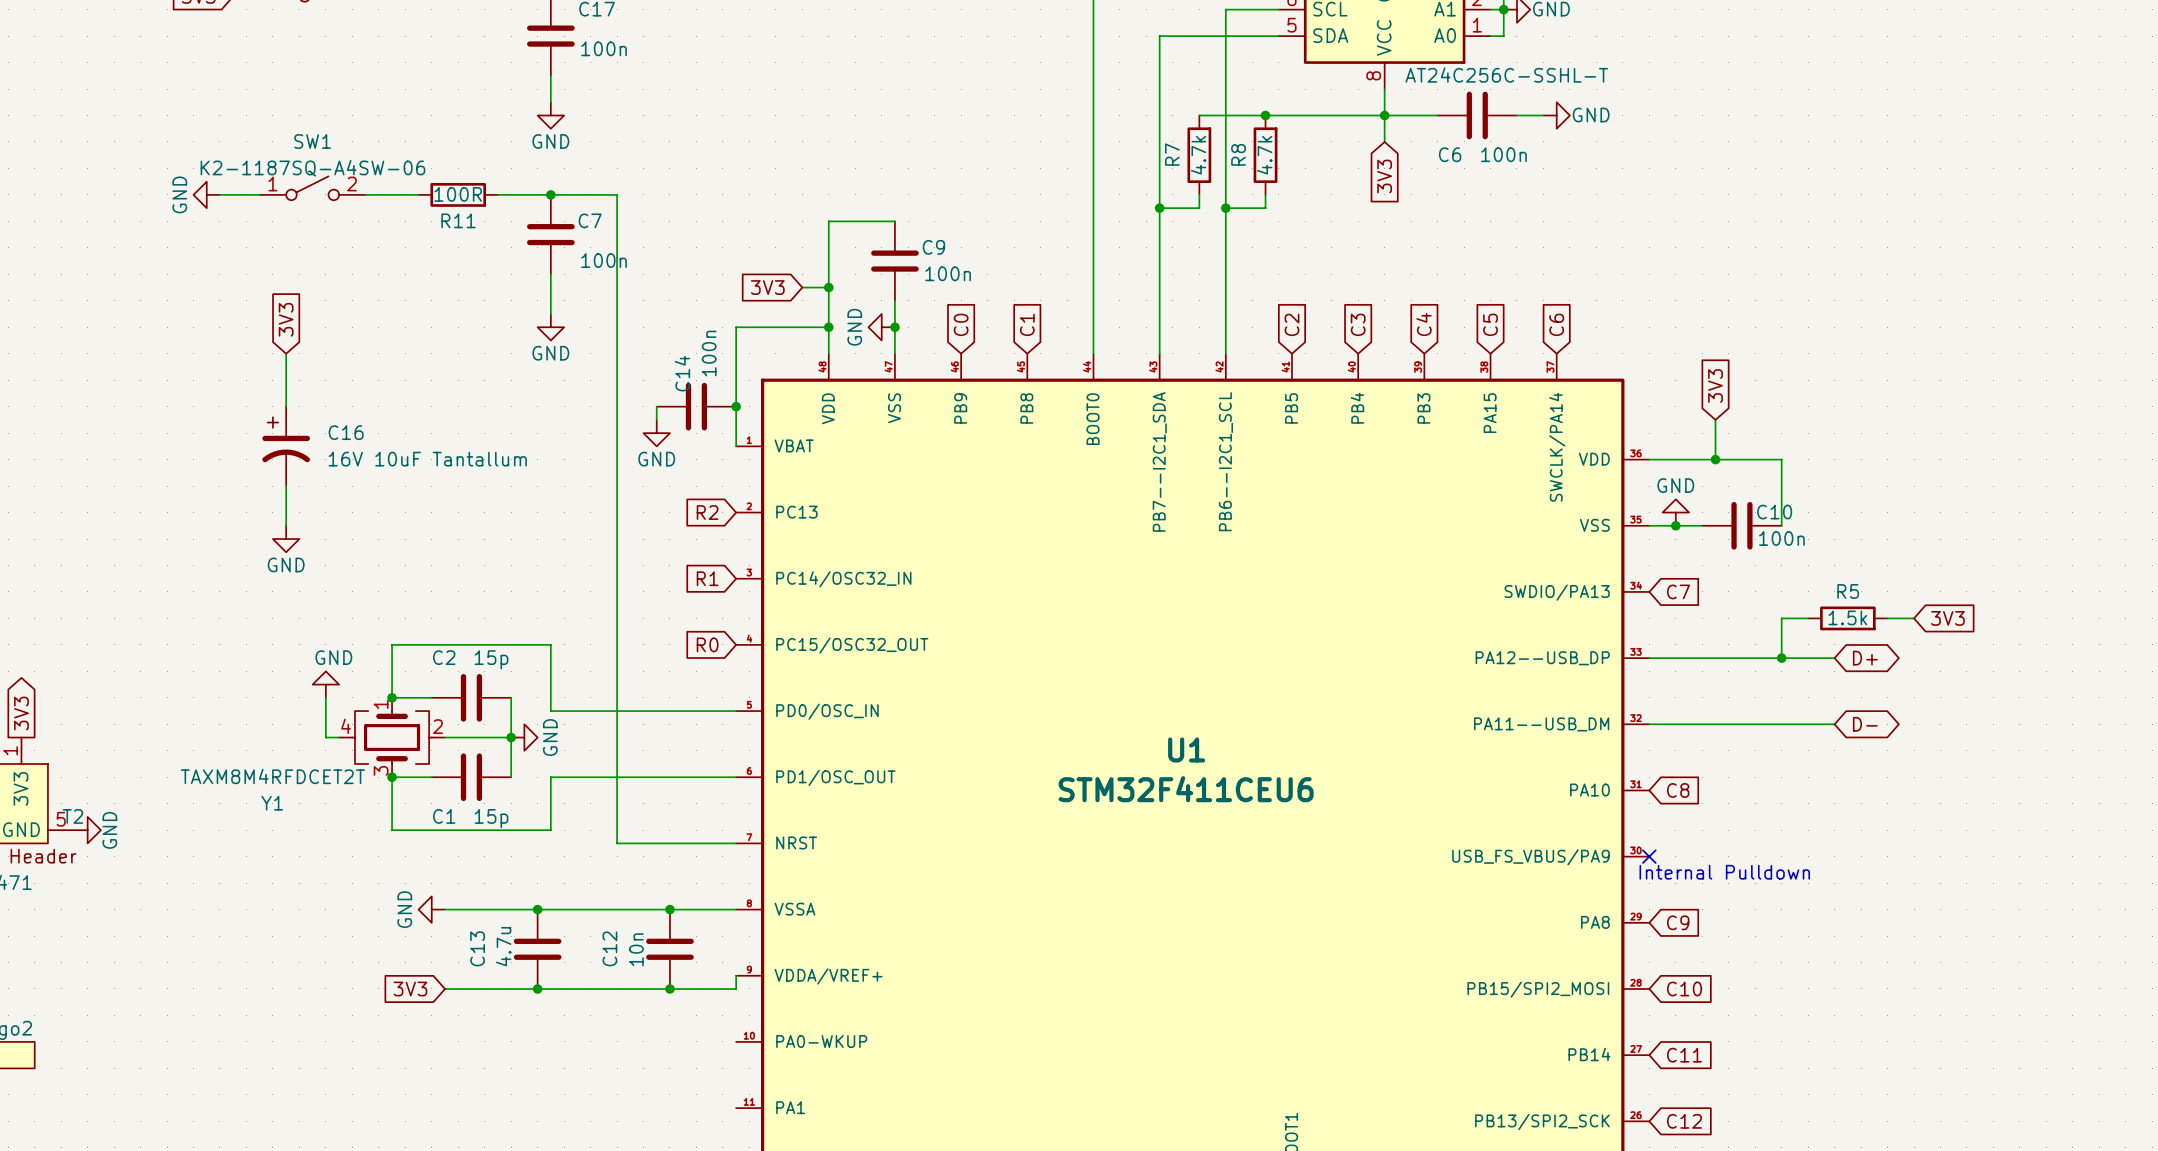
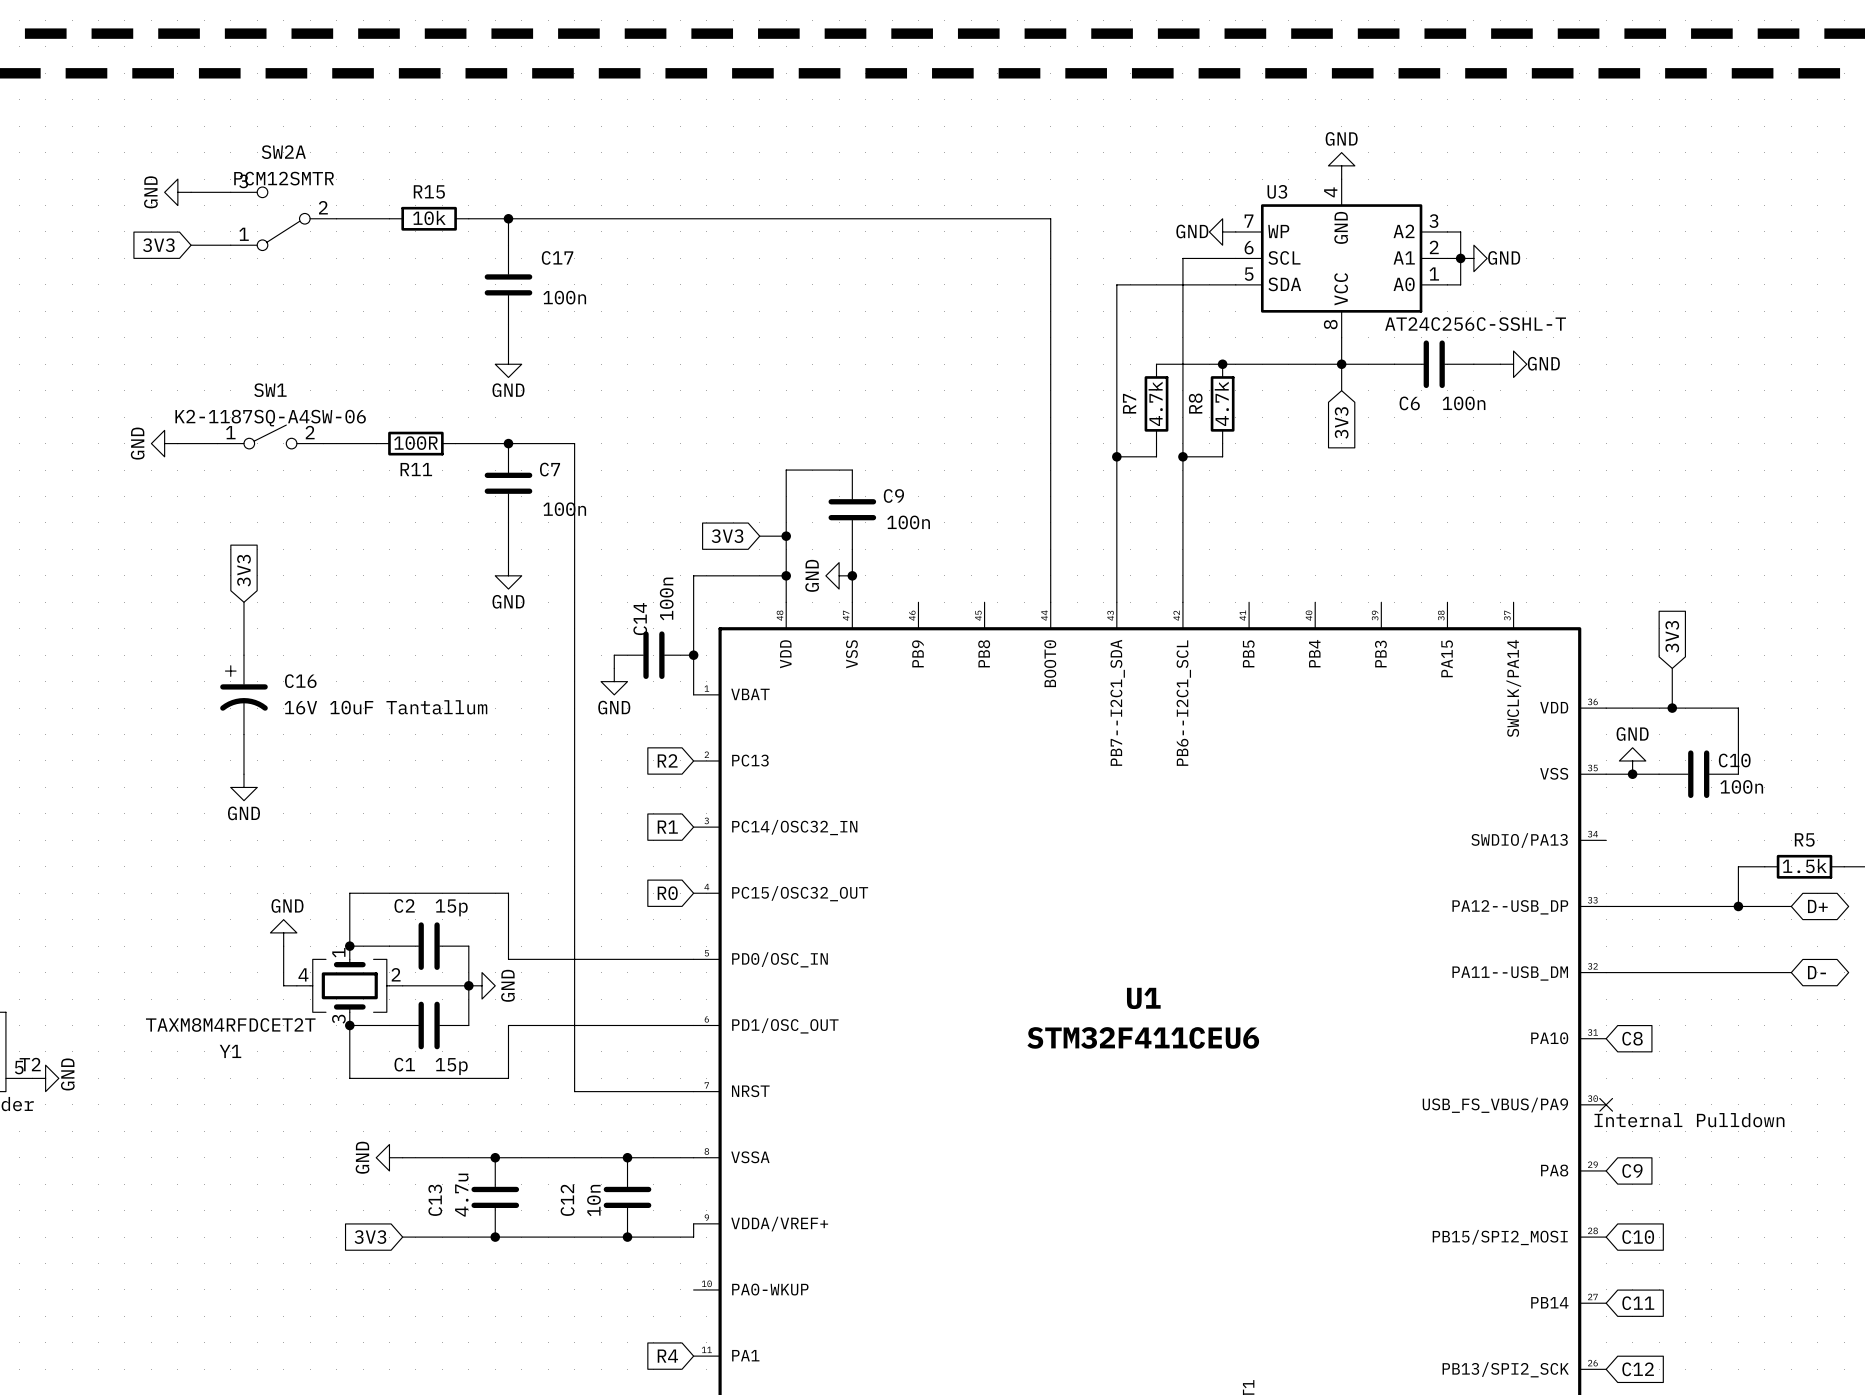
global label: C0 (961, 324) -> none
global label: C1 (1027, 324) -> none
global label: C2 (1292, 324) -> none
global label: C3 (1358, 324) -> none
global label: C4 (1424, 324) -> none
global label: C5 (1490, 324) -> none
global label: C6 (1556, 324) -> none
global label: C7 (1678, 591) -> none
global label: none -> R4 (667, 1356)

